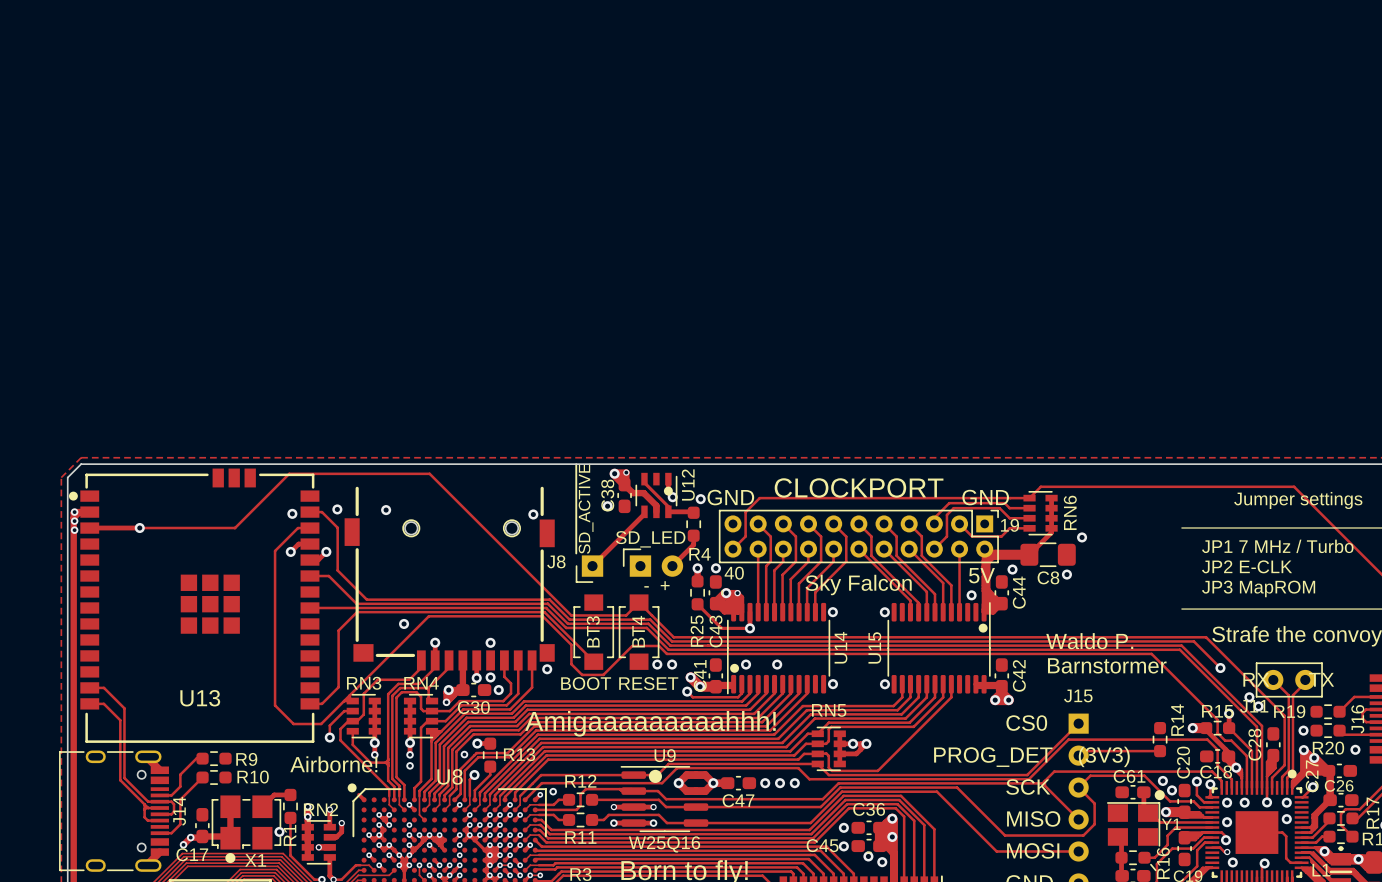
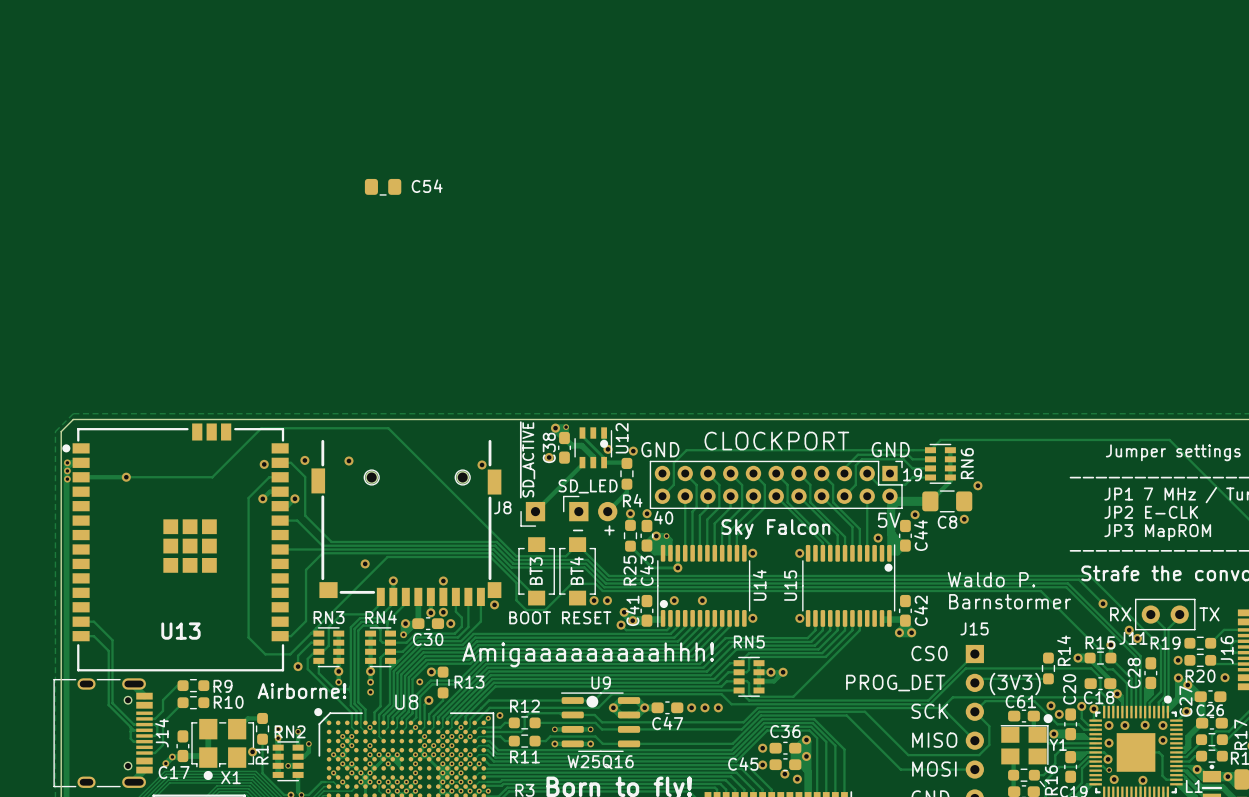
C54: none -> (383, 187)

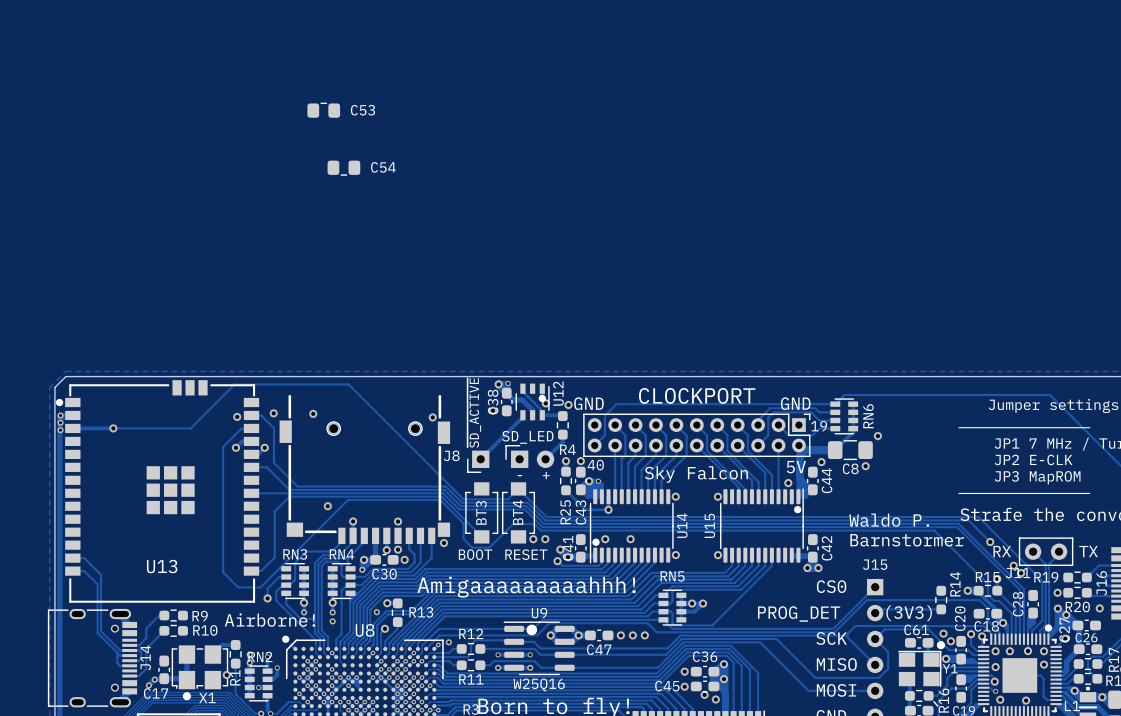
C53: none -> (323, 110)
via: (415, 763) -> none
via: (415, 772) -> none

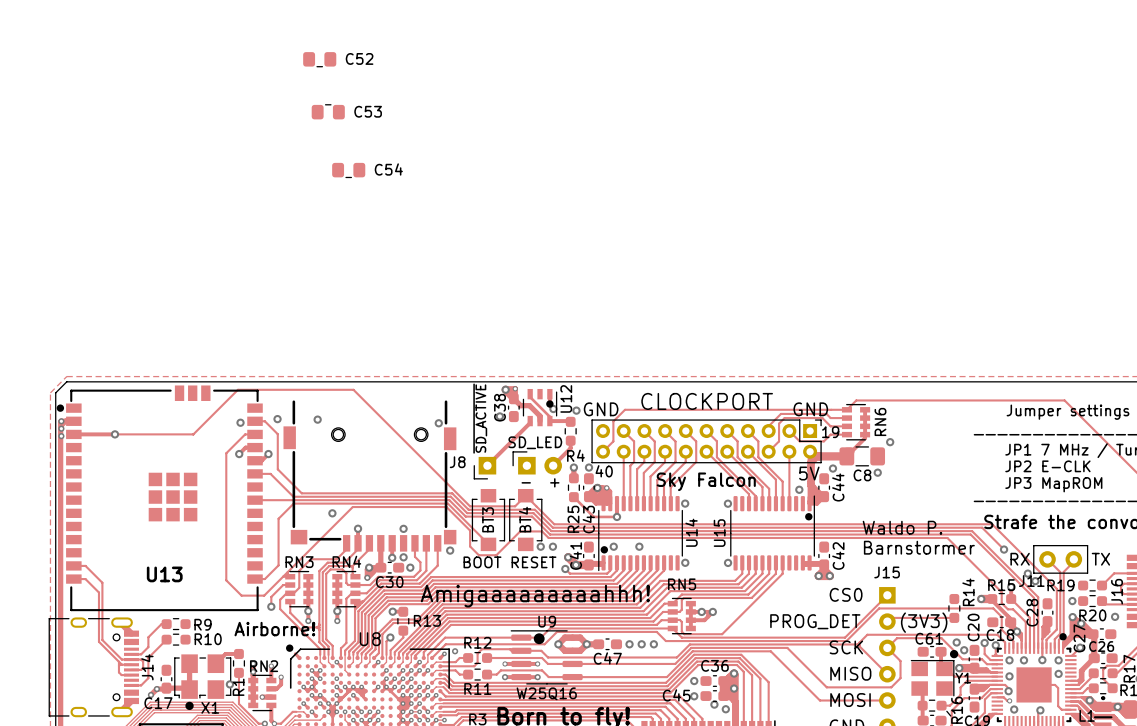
C52: none -> (319, 59)
via: (376, 612) -> none
via: (332, 621) -> none

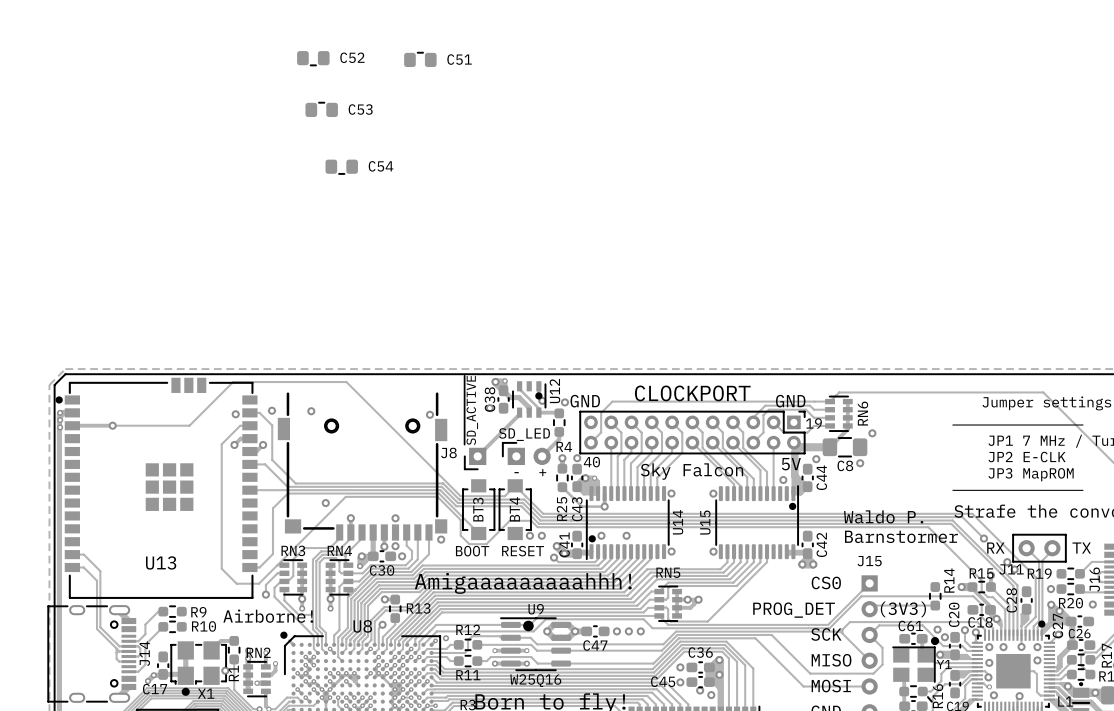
C51: none -> (420, 59)
via: (336, 678) -> none

